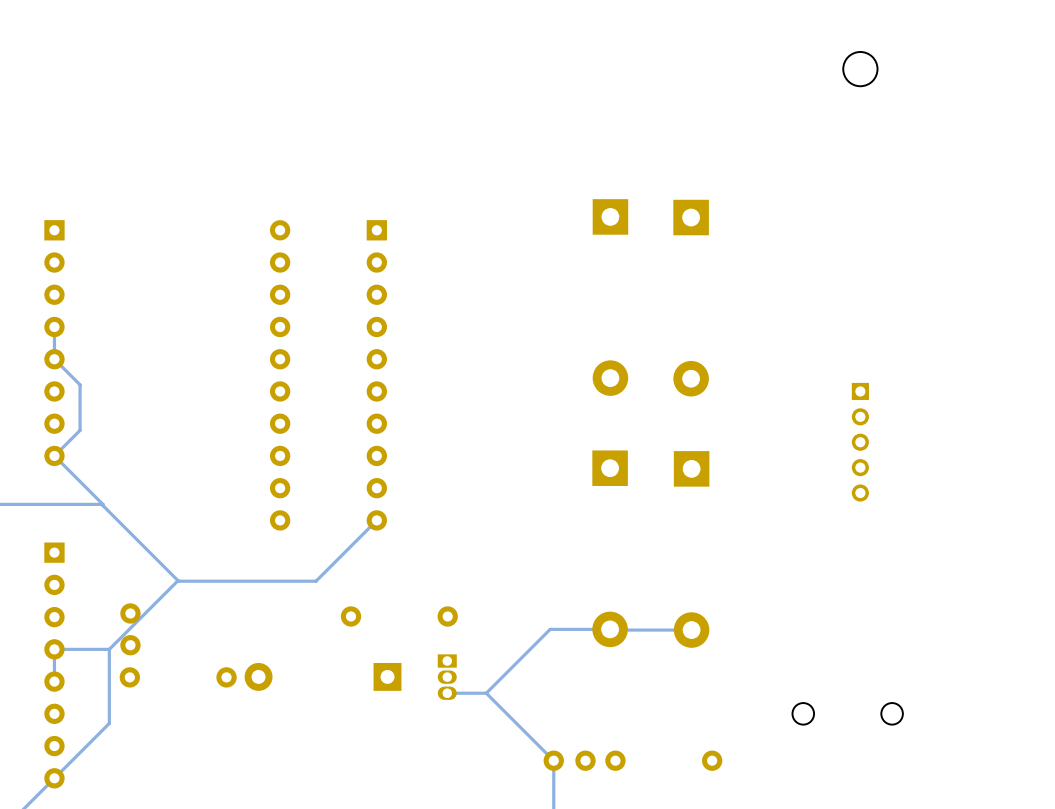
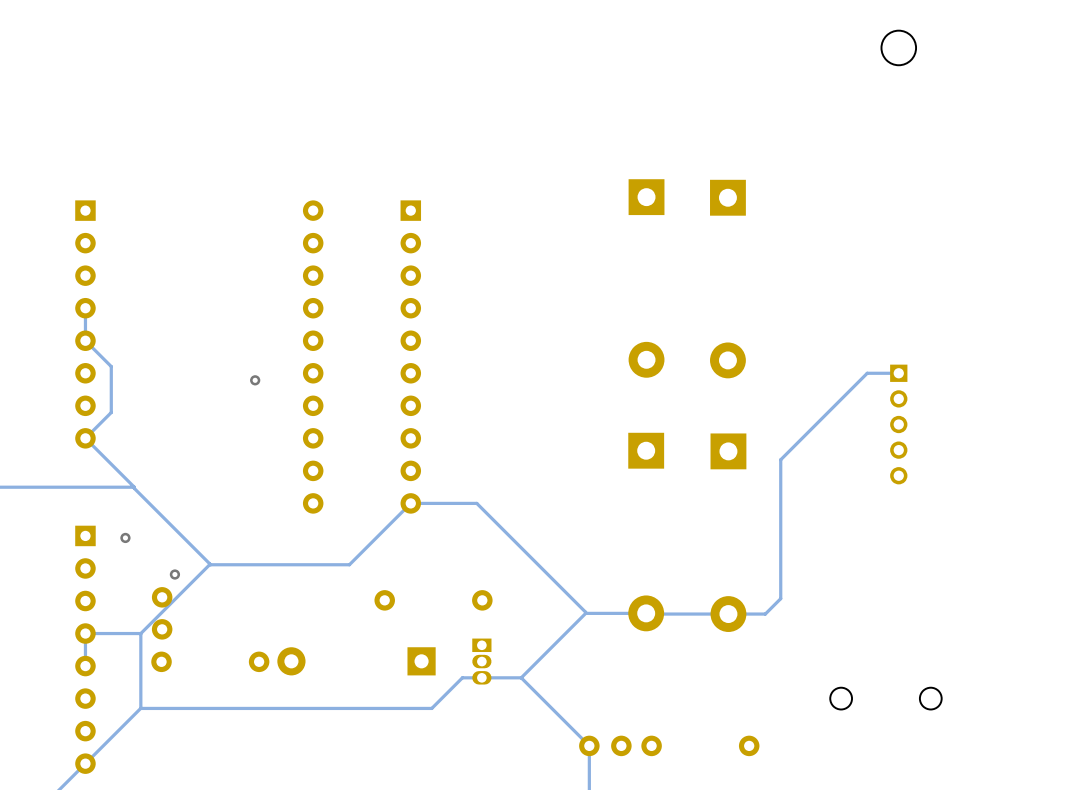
track: none -> (898, 373) (867, 373) (780, 459) (780, 598) (765, 614) (728, 614)
via: none -> (255, 380)
track: none -> (410, 503) (476, 503) (585, 613)
via: none -> (125, 537)
via: none -> (174, 574)
track: none -> (481, 677) (462, 677) (431, 708) (140, 708)

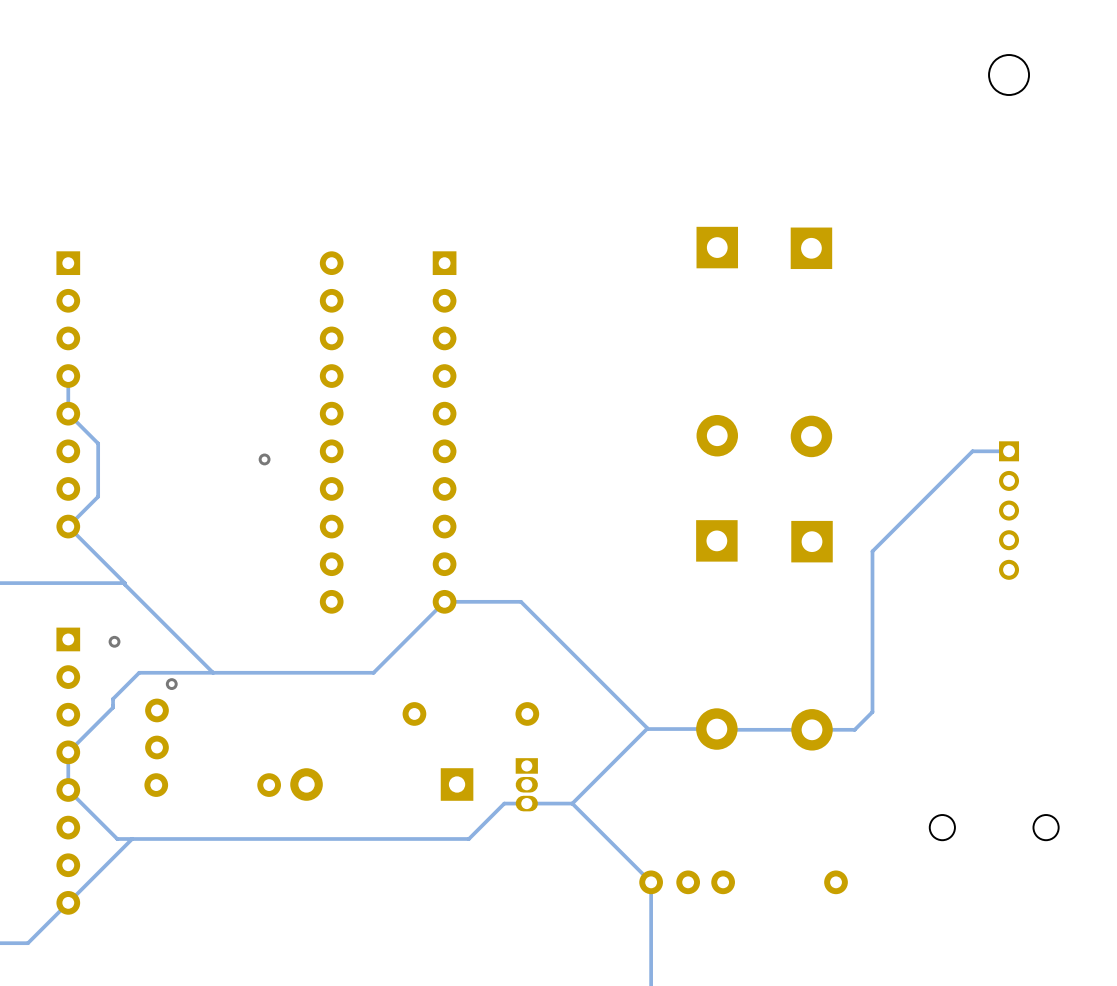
track: (210, 564) (140, 633) -> none
track: (140, 633) (140, 708) -> (68, 789) (117, 838) (132, 838)
track: (140, 633) (85, 633) -> (213, 672) (139, 672) (113, 698) (113, 707) (68, 752)

